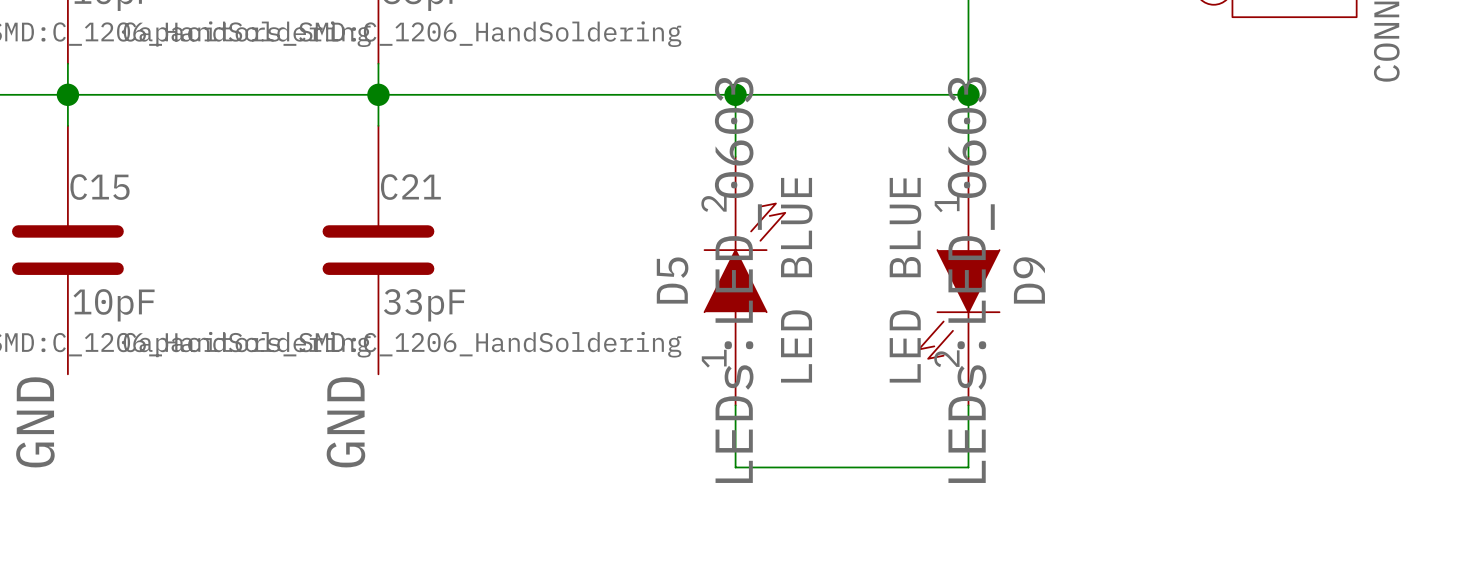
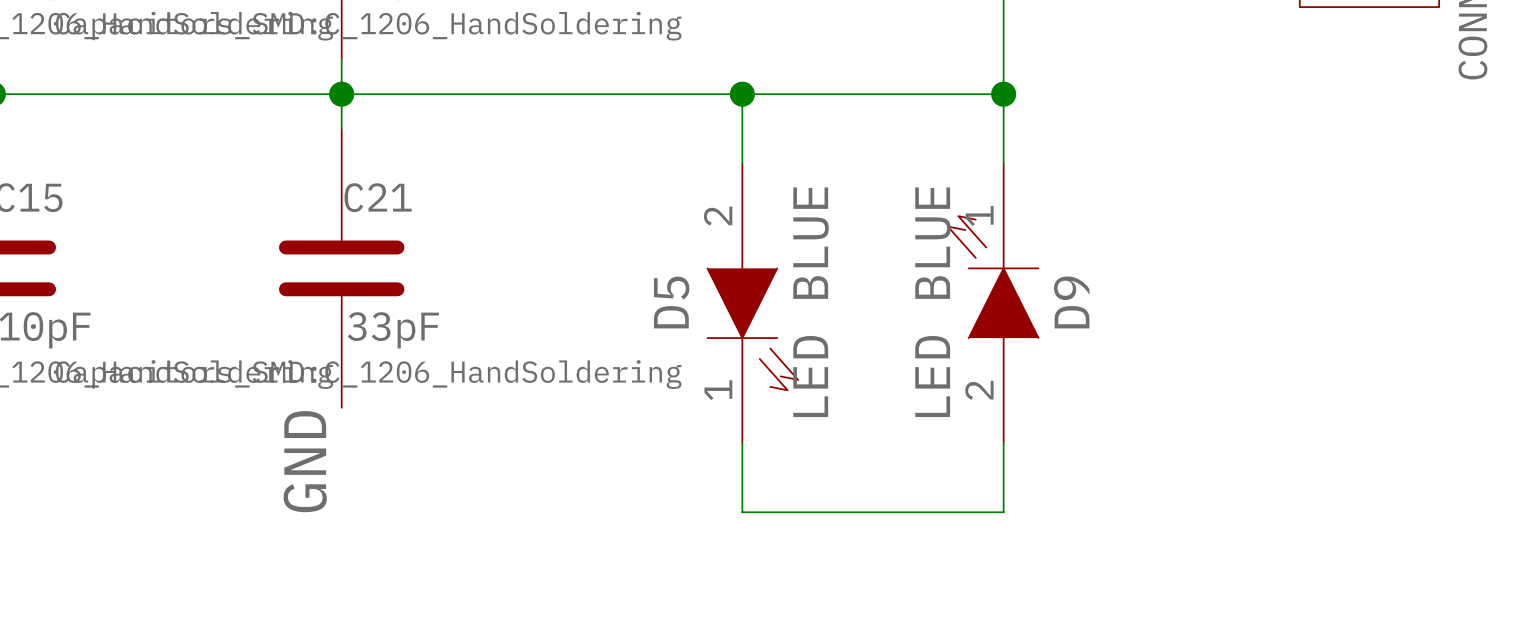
D5 symbol: [704, 156, 786, 406] -> [707, 163, 799, 443]
D9 symbol: [918, 156, 1000, 406] -> [947, 163, 1039, 443]
D5 text: LEDs:LED_0603 (738, 280) -> none
D9 text: LEDs:LED_0603 (971, 280) -> none

